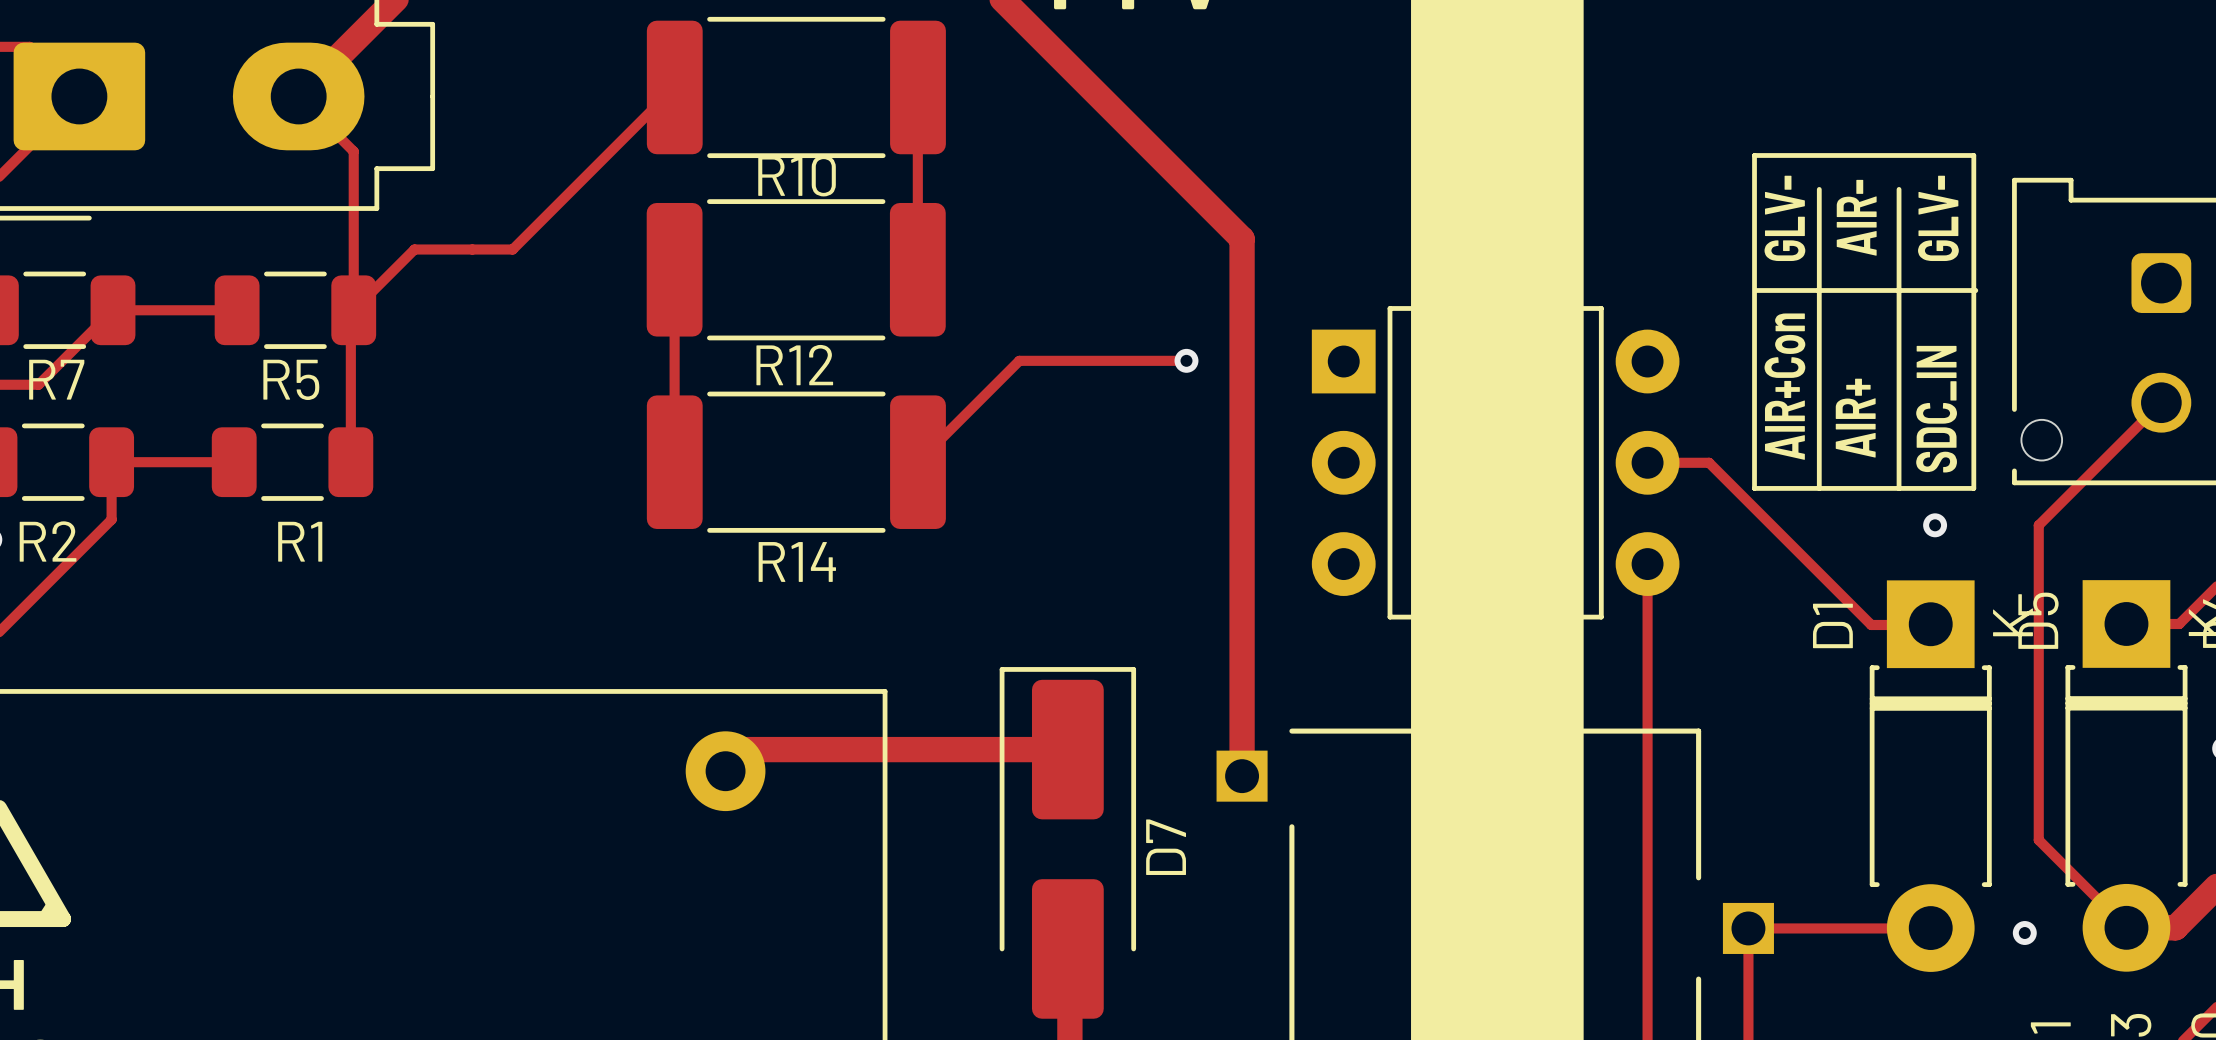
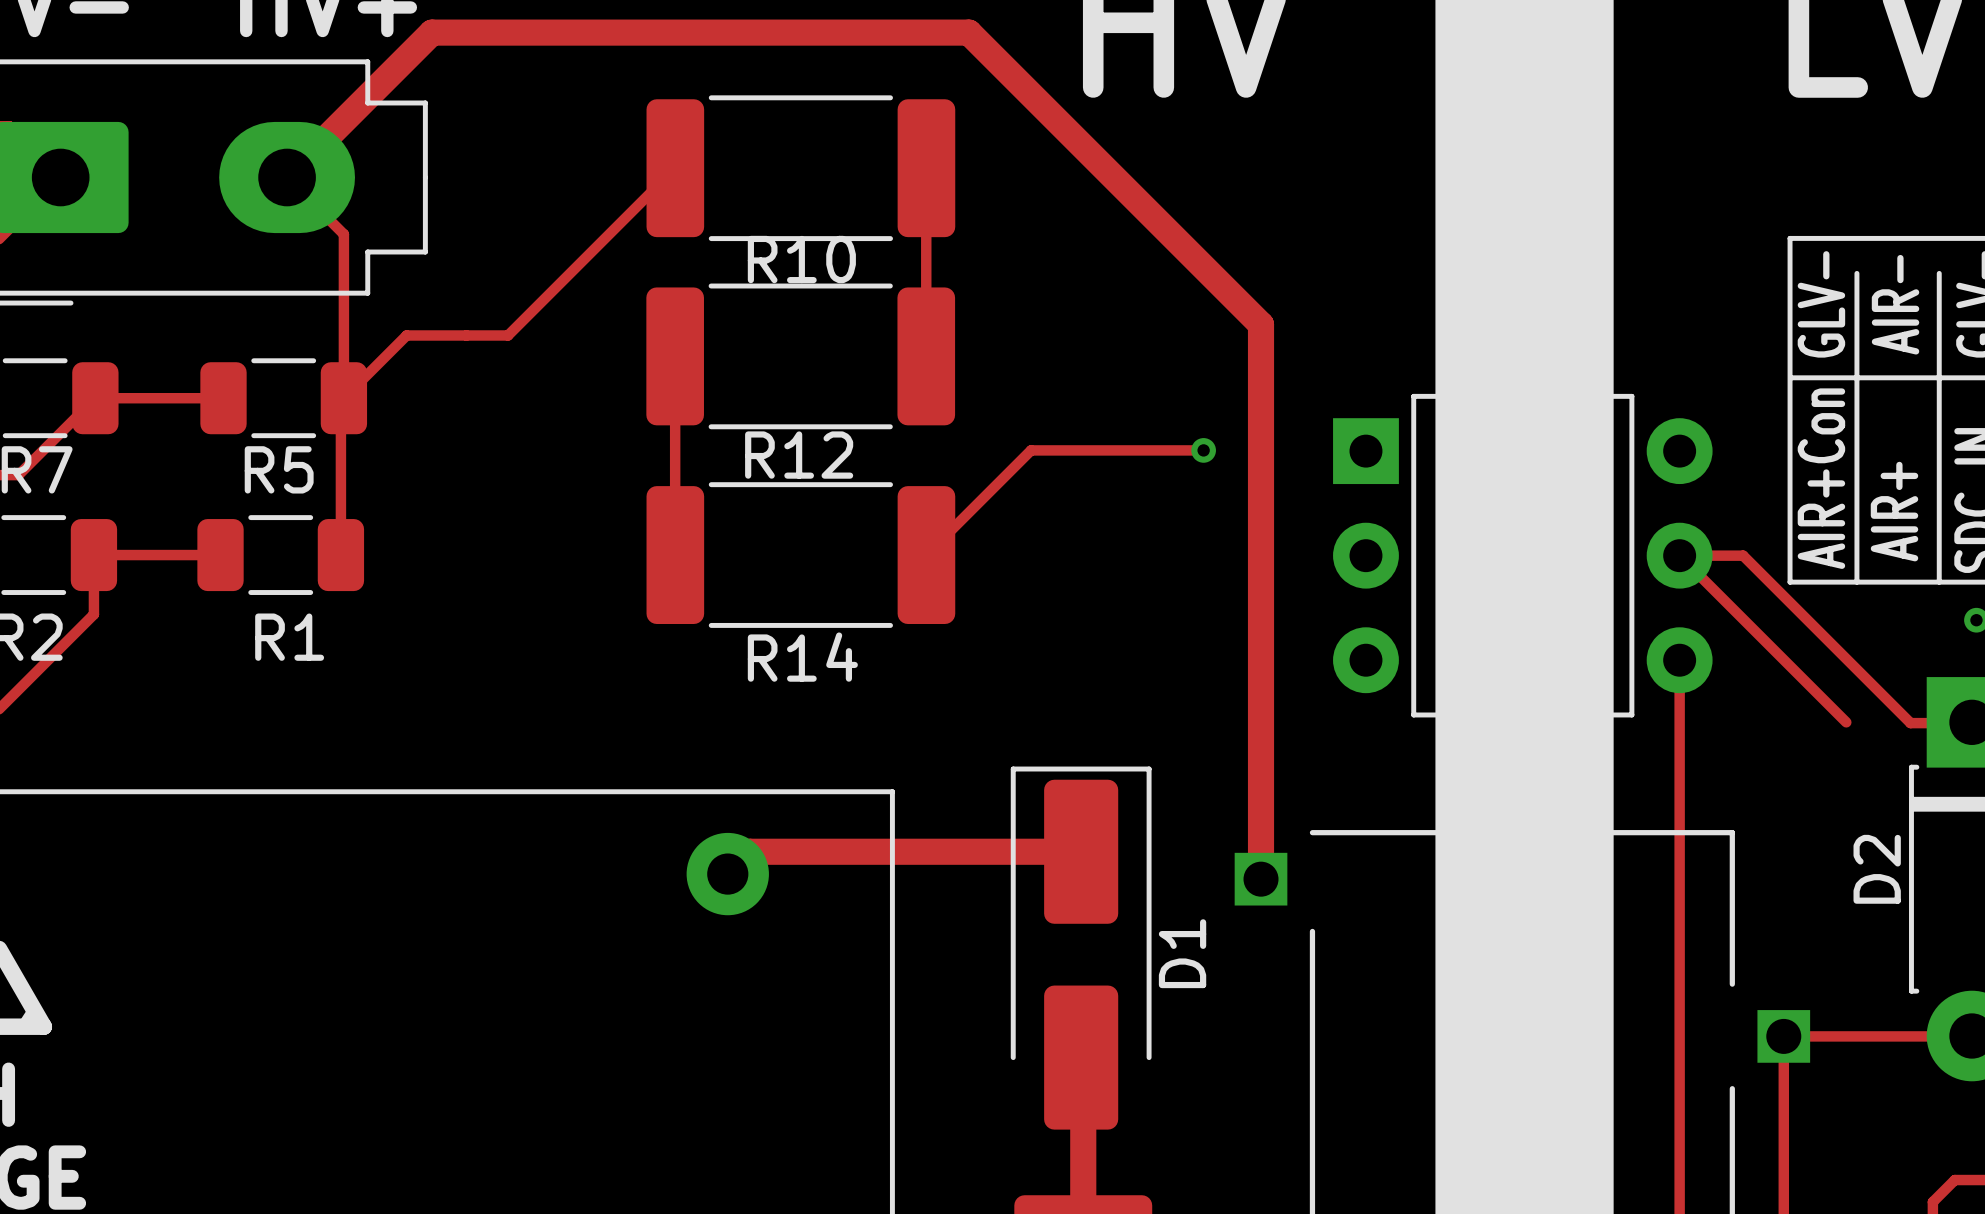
track: none -> (1679, 565) (1679, 555) (1846, 722)
D1 name: D1 (1832, 625) -> D2 (1877, 869)
D7 name: D7 (1166, 847) -> D1 (1182, 953)

